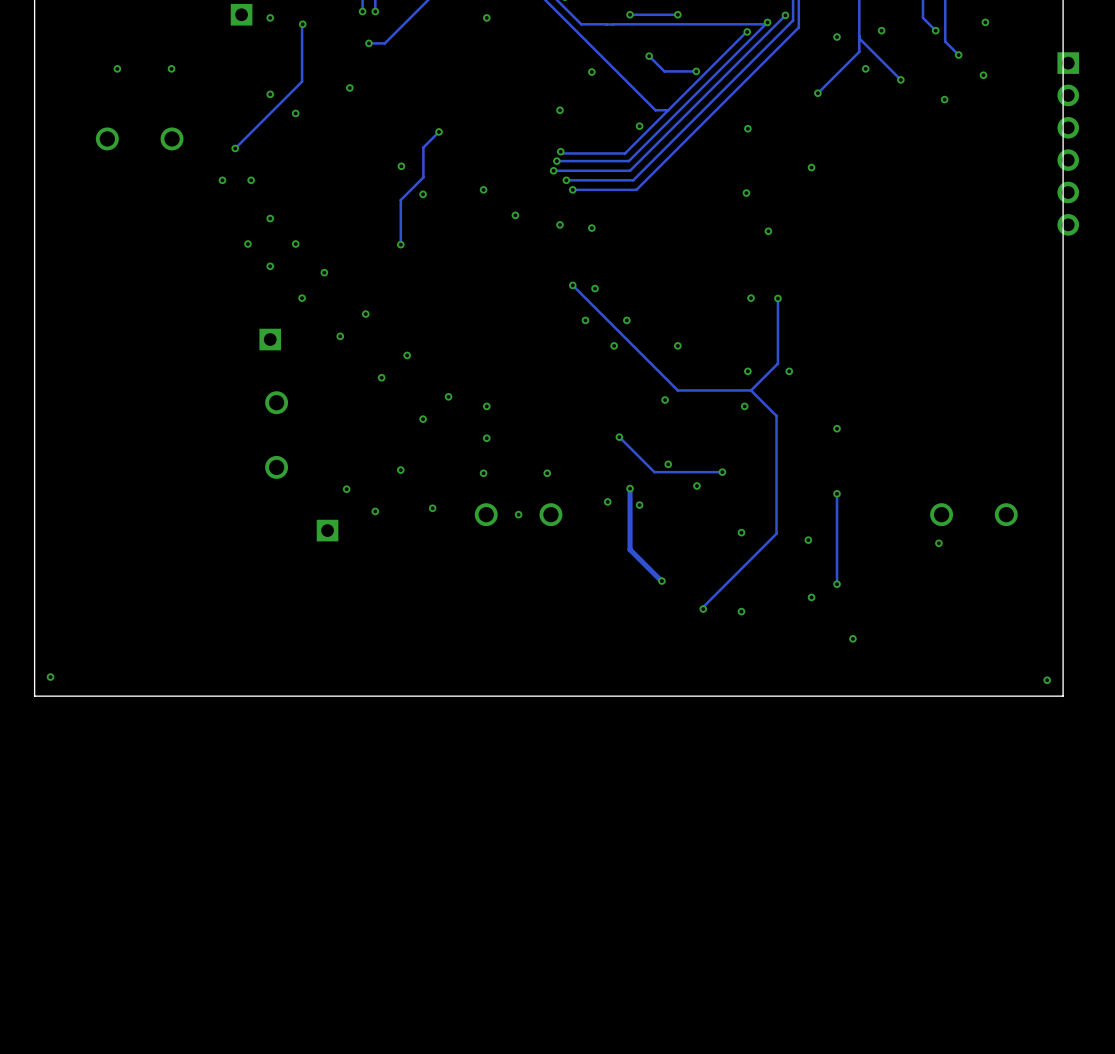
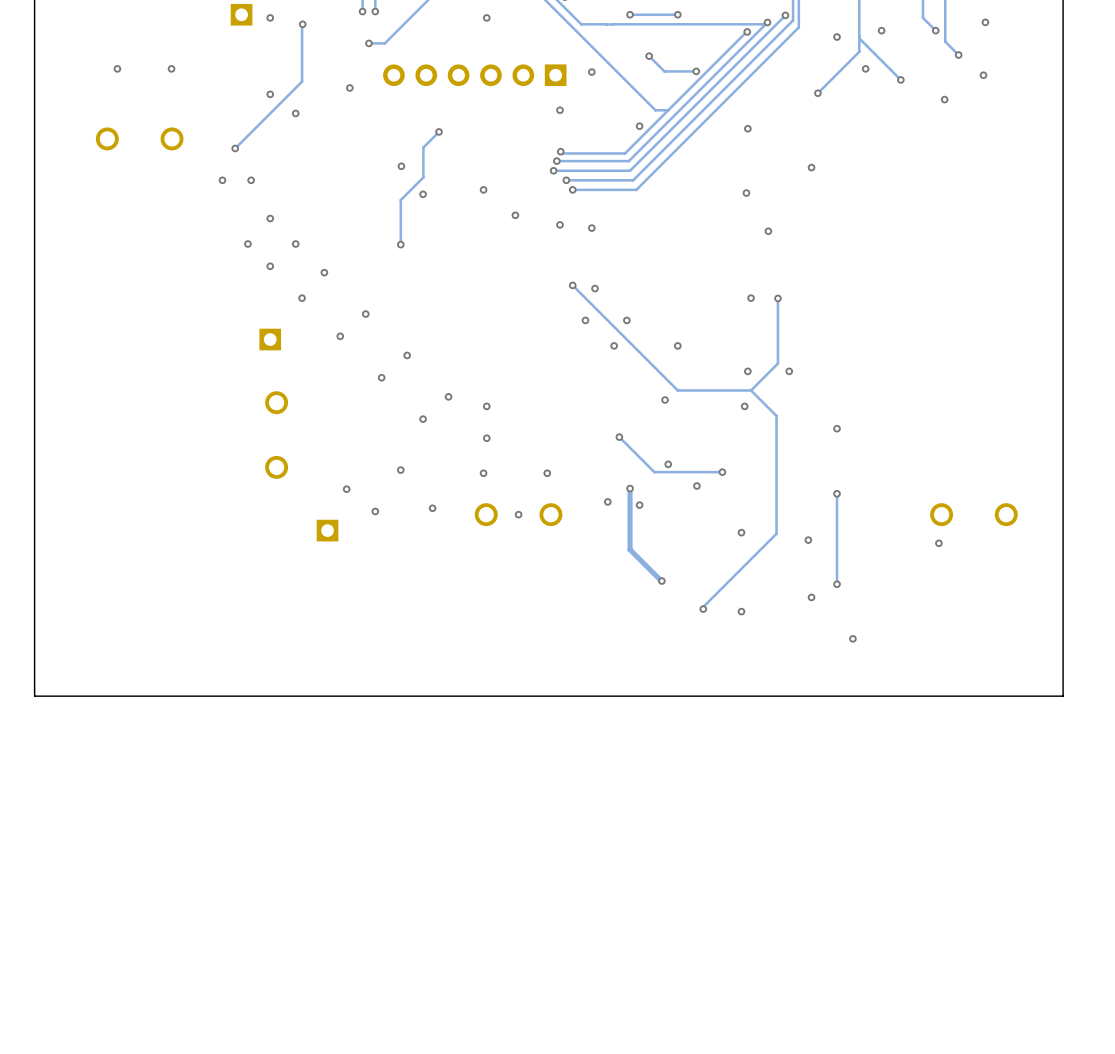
part: none -> (474, 75)
part: (1068, 143) -> none
via: (50, 677) -> none
via: (1047, 680) -> none

